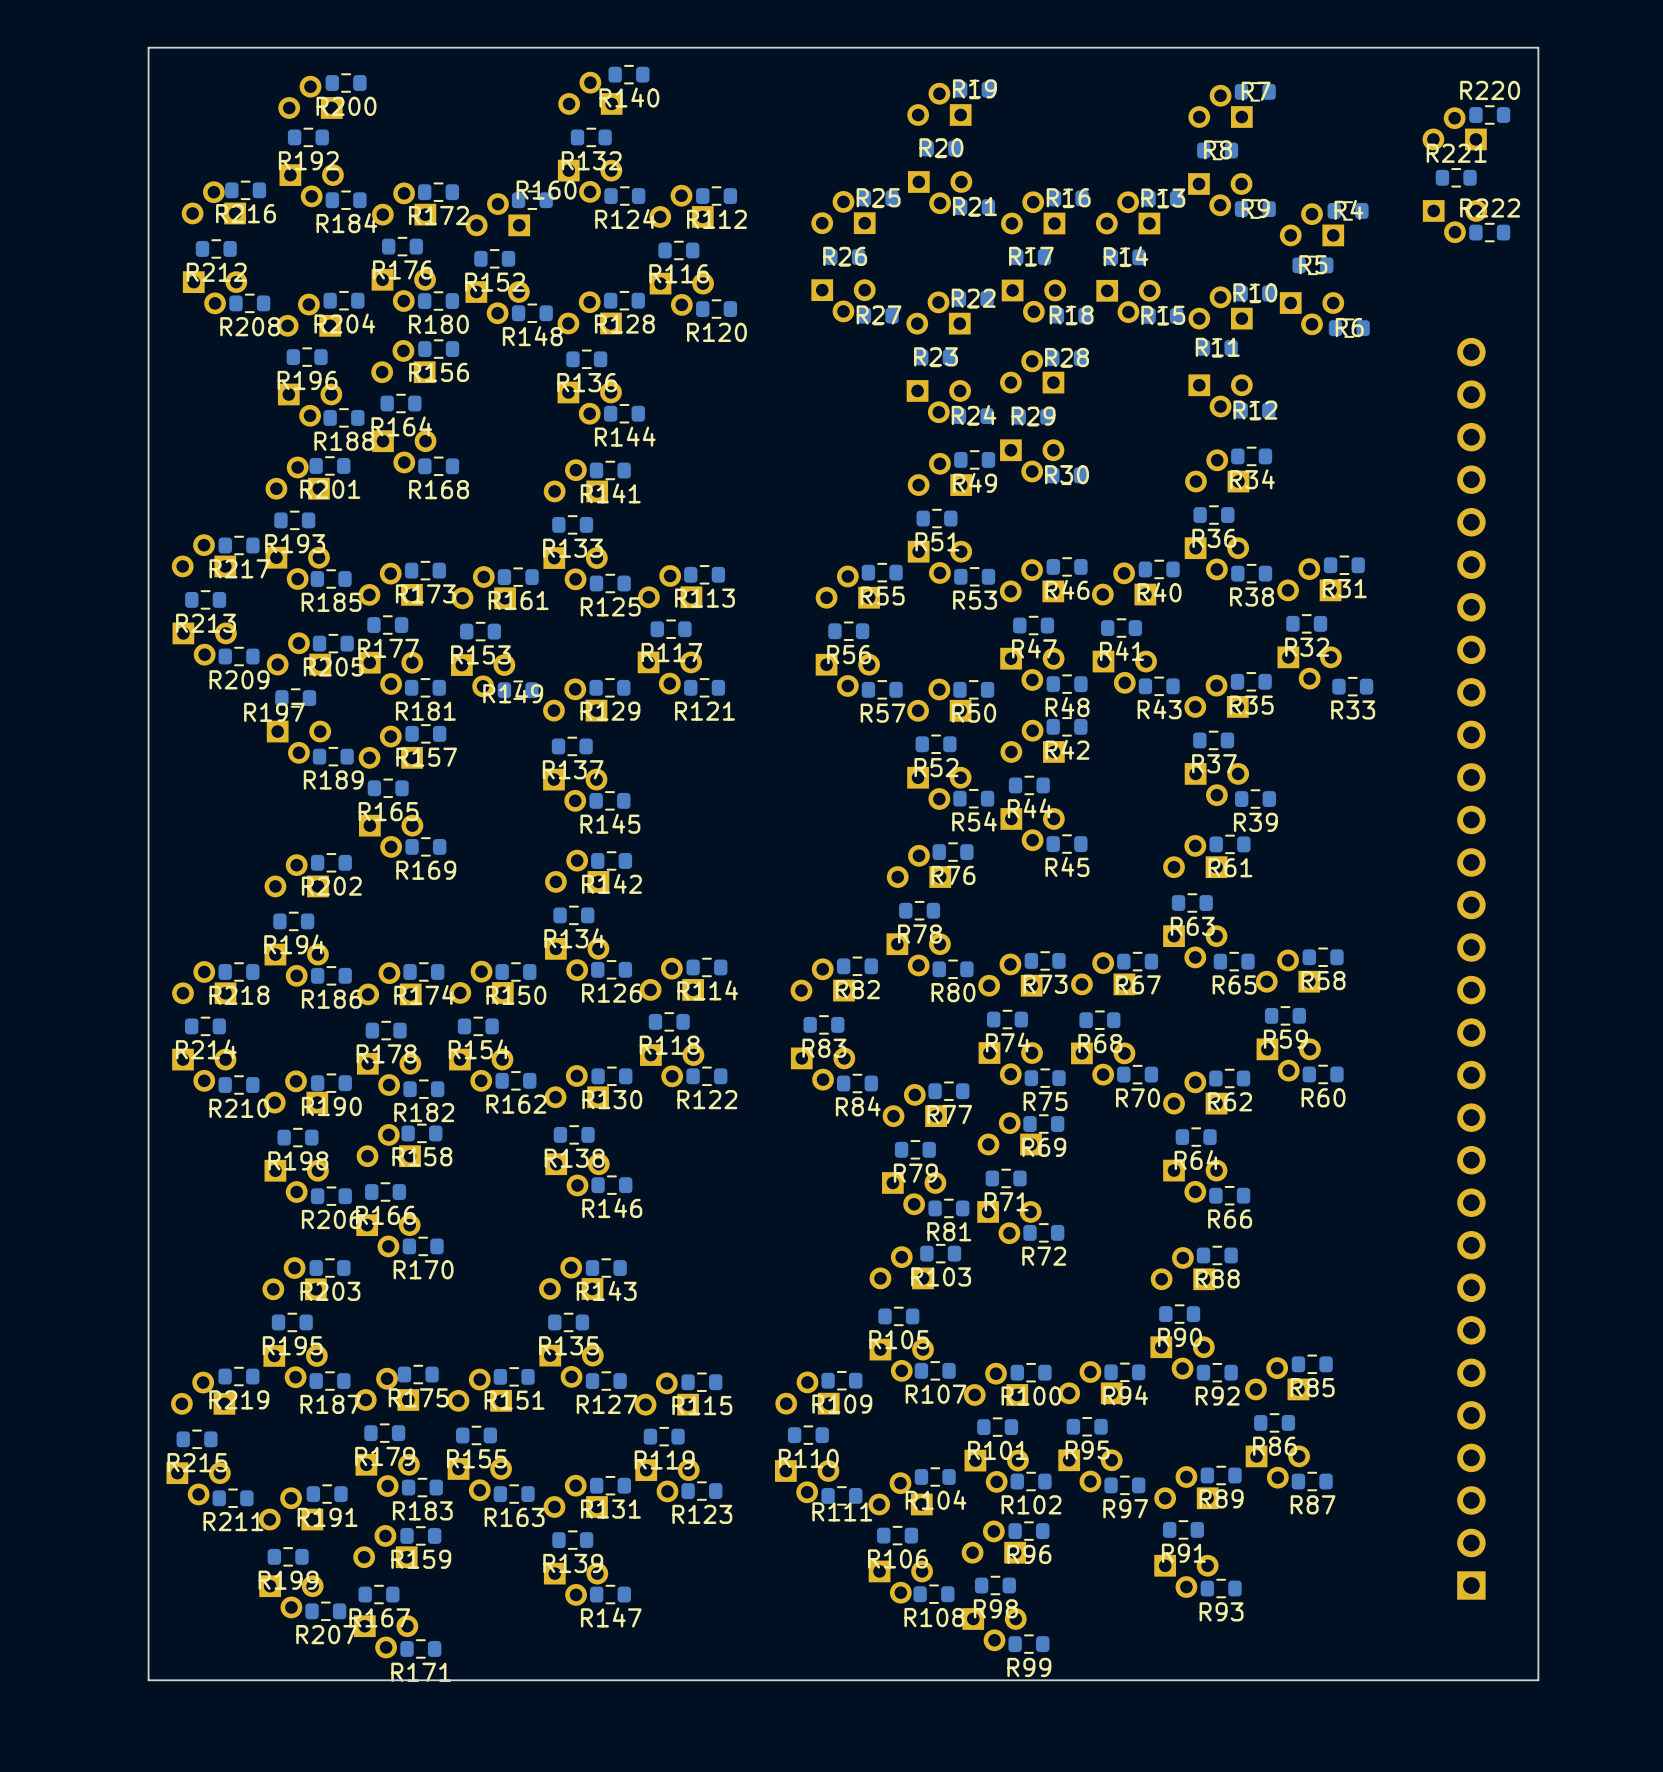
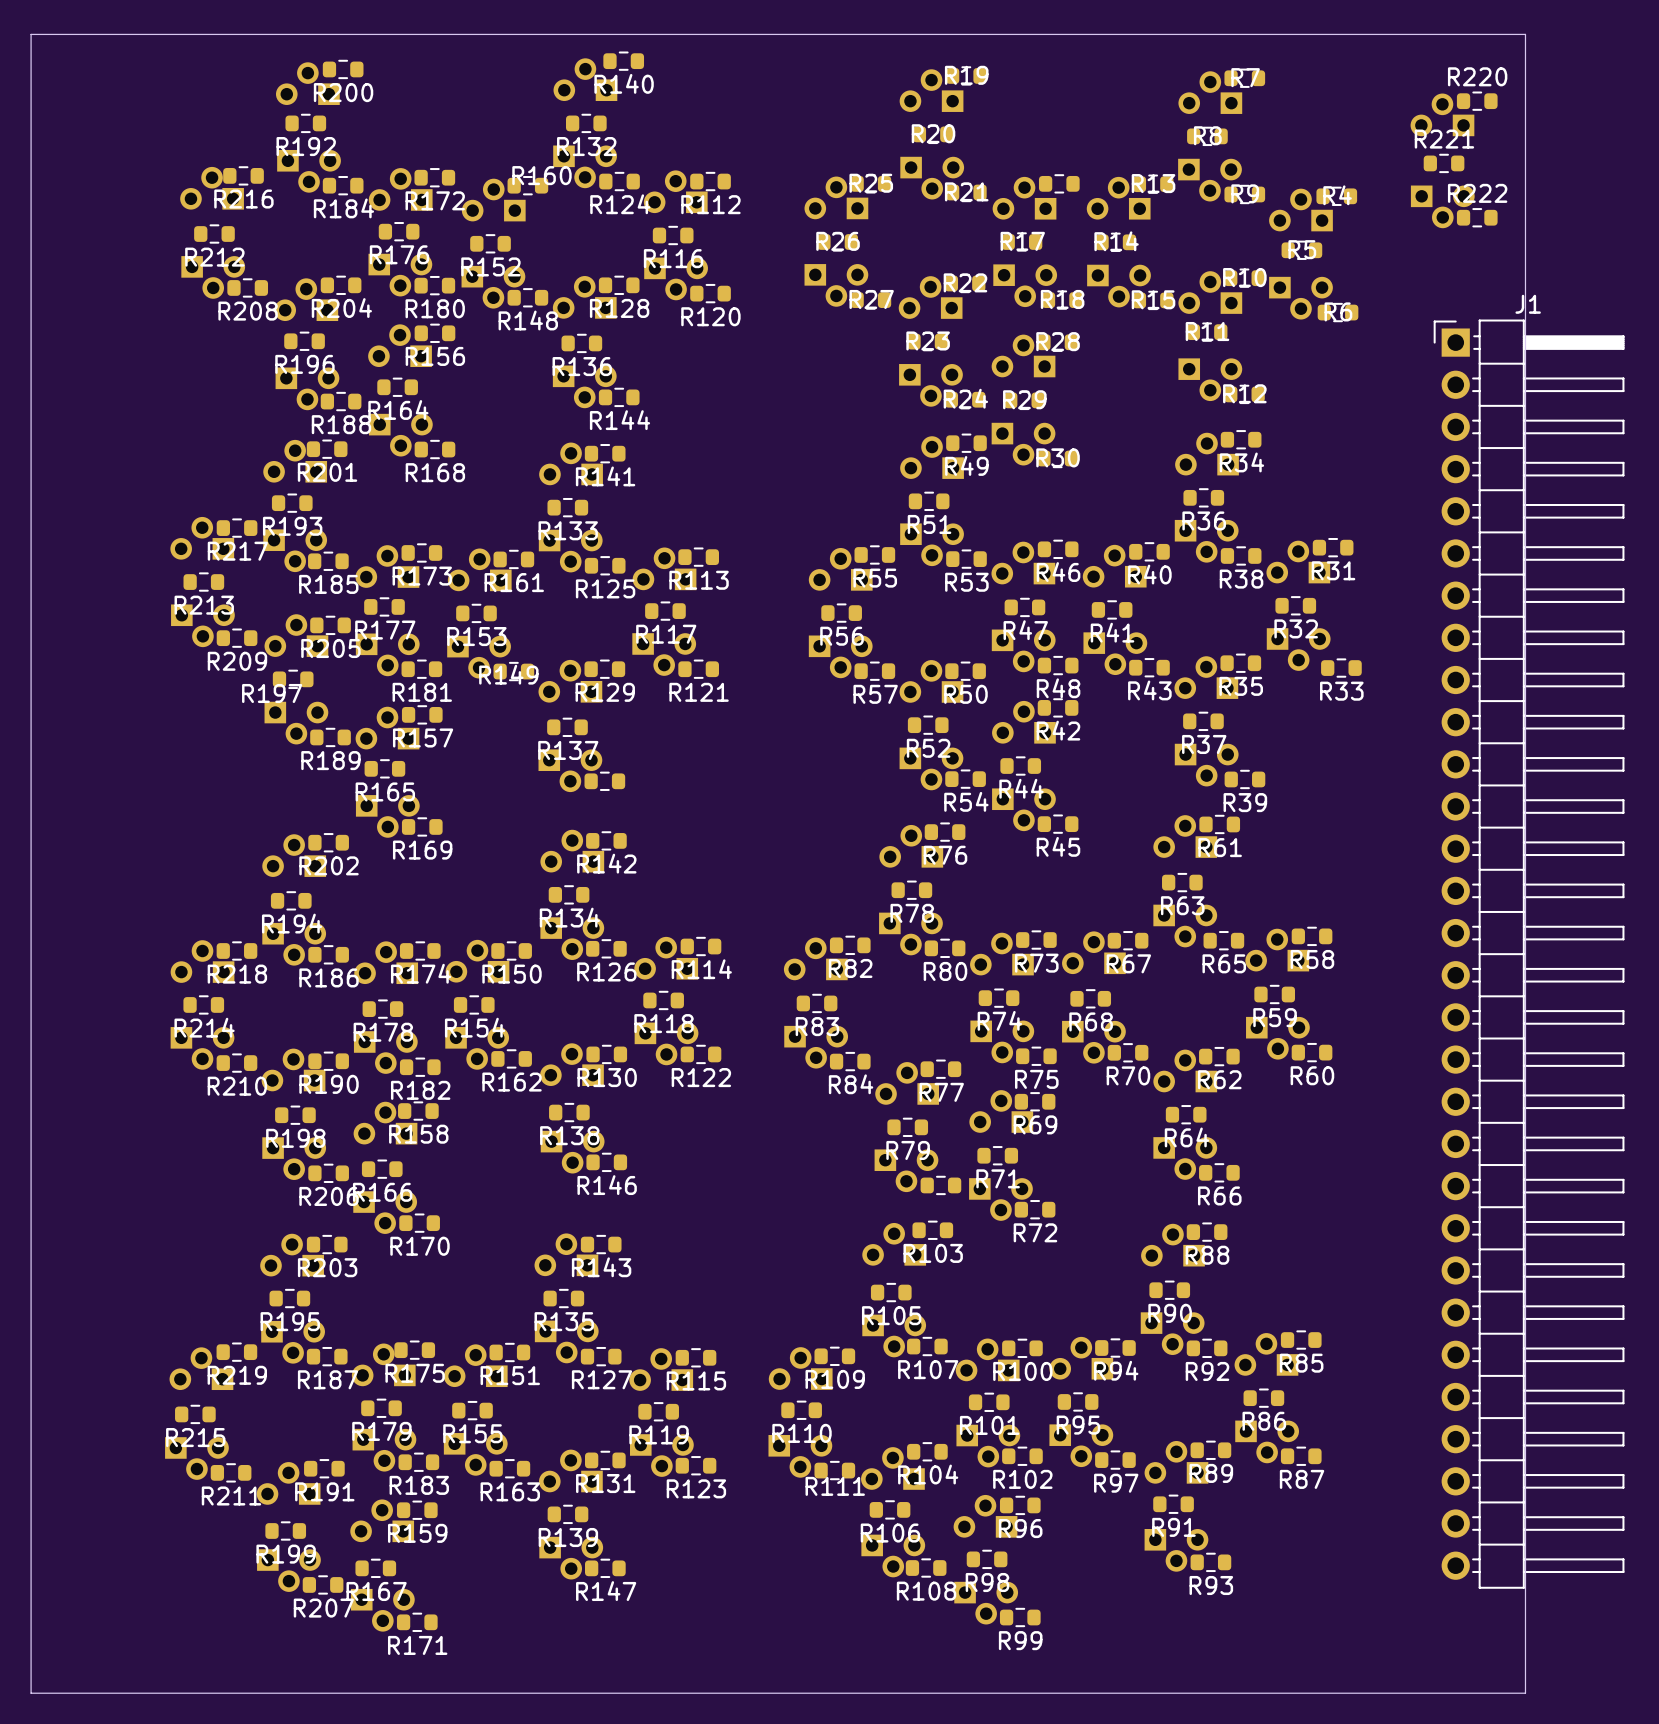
board edge: (148, 47) (148, 1680) (1538, 1680) -> (147, 34) (31, 34) (31, 1693) (1525, 1693) (1525, 1653)
R16 name: R16 (1068, 197) -> none
R145 name: R145 (610, 823) -> none
J1 side: top (1471, 968) -> bottom (1529, 954)
R81 name: R81 (949, 1231) -> none

